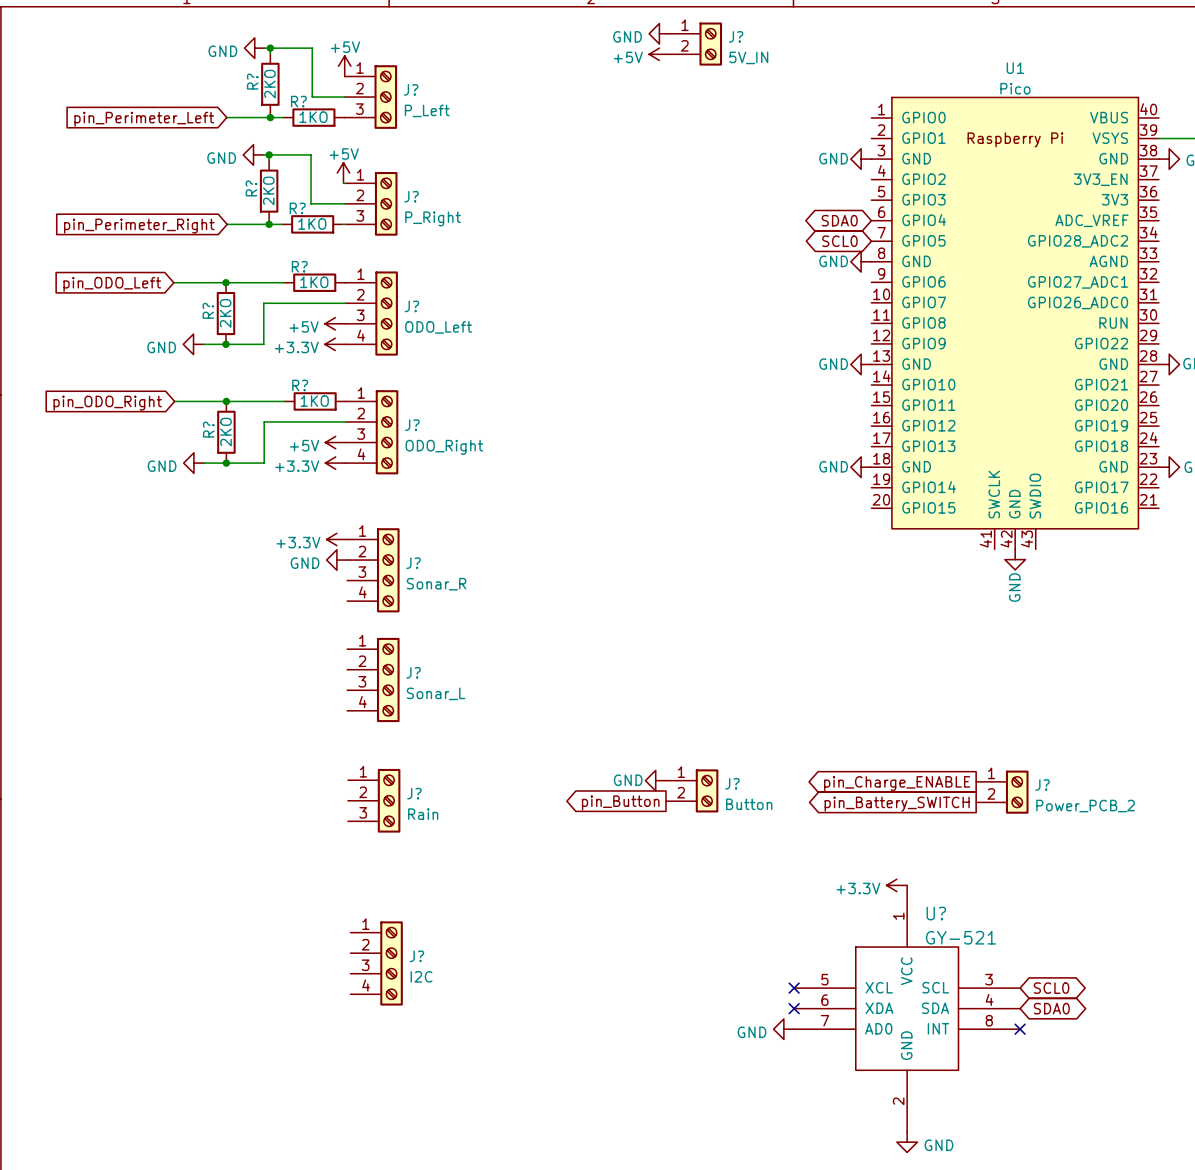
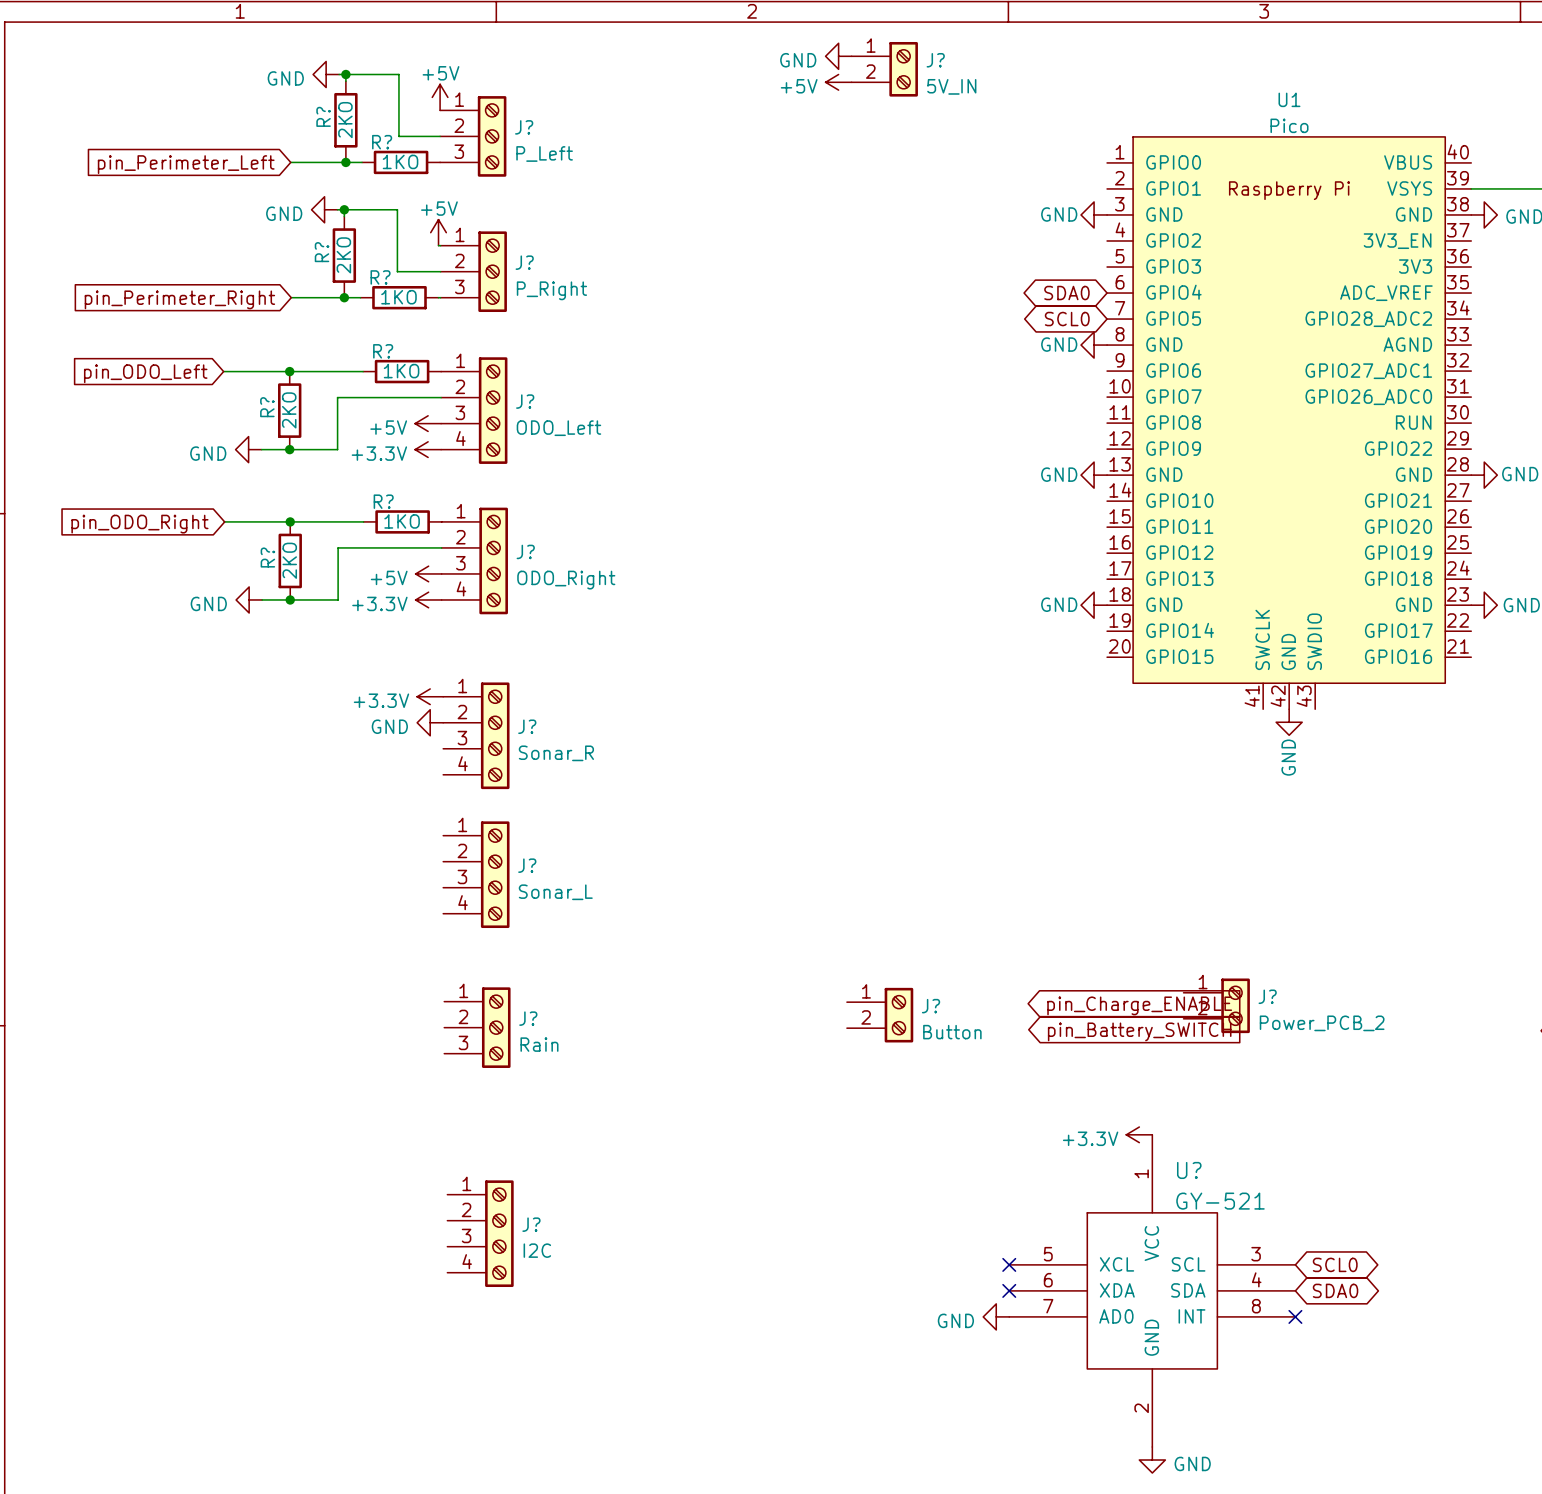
power symbol: GND (655, 780) -> none
J? position: (1002, 792) -> (1216, 1005)
global label: pin_Button (620, 802) -> none

